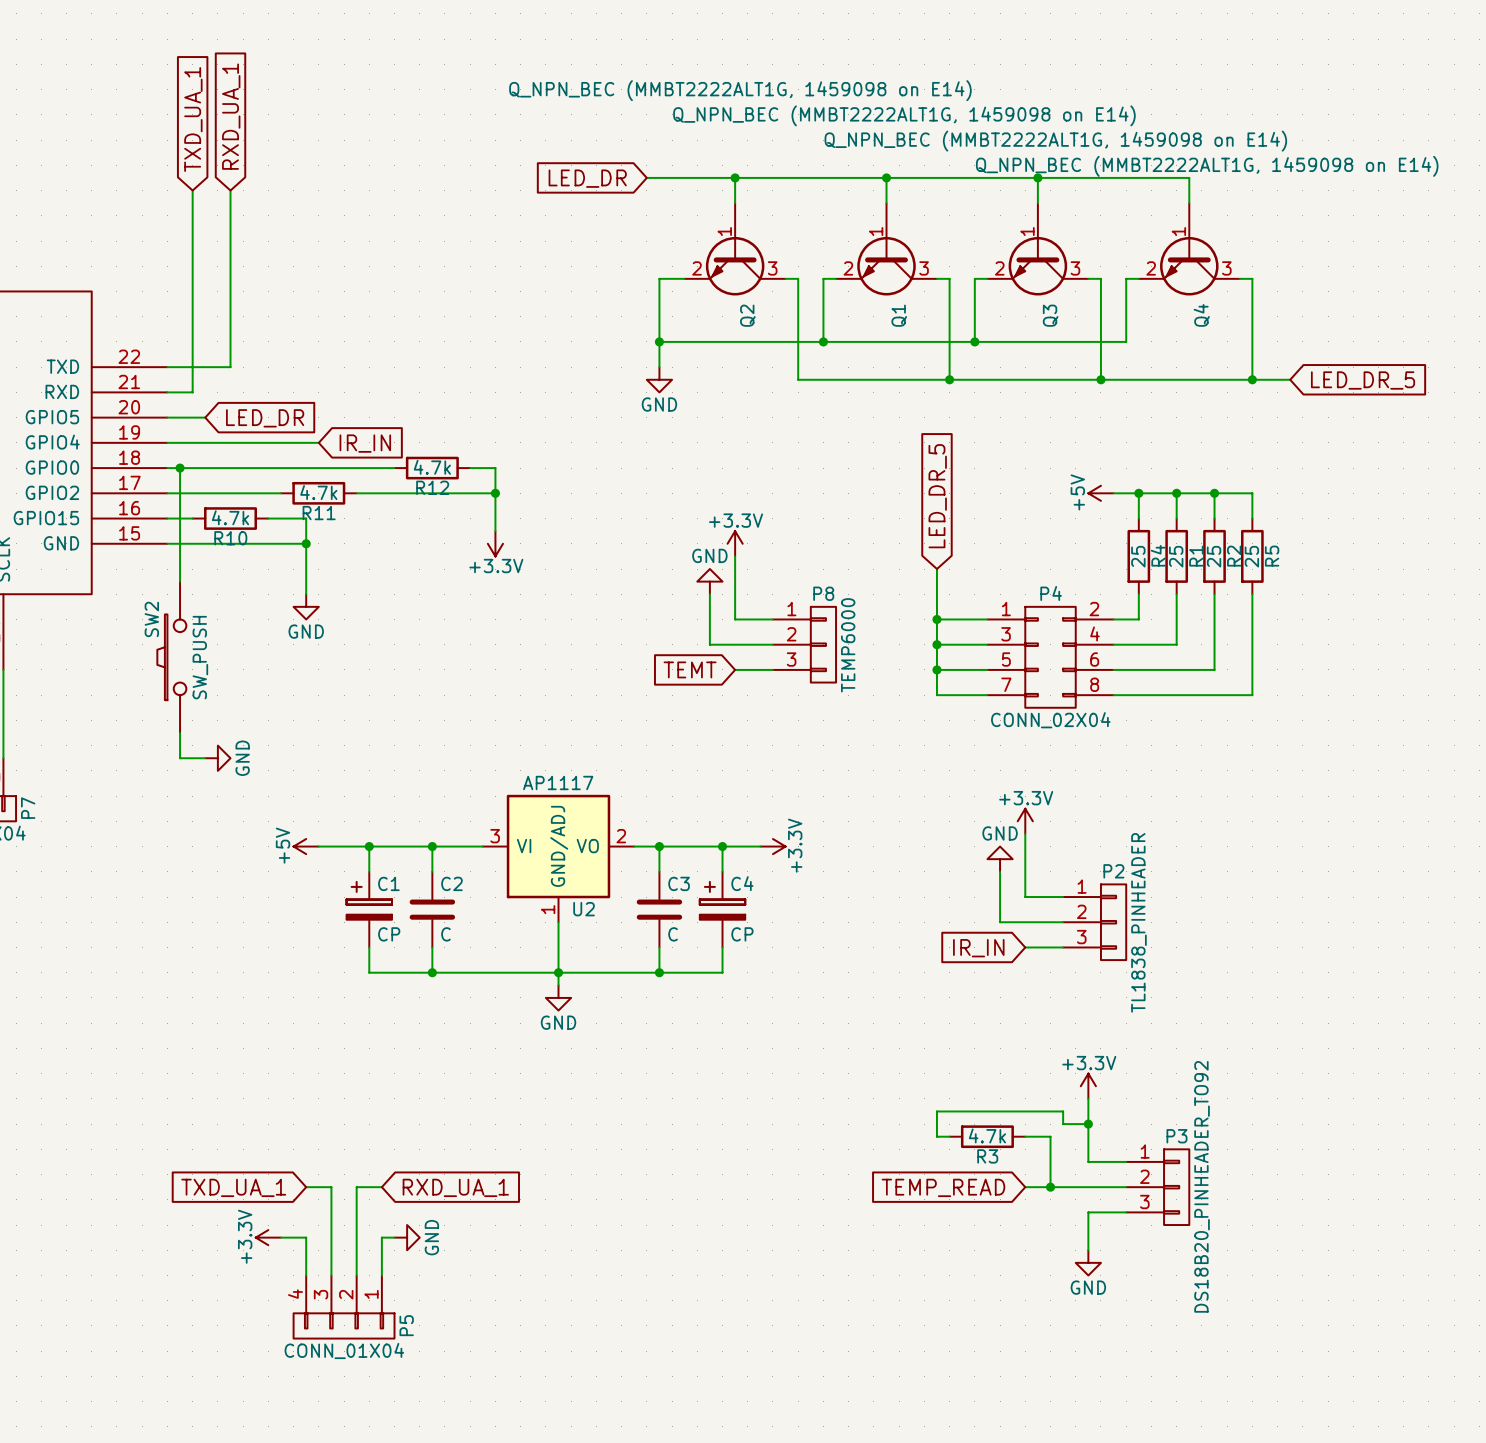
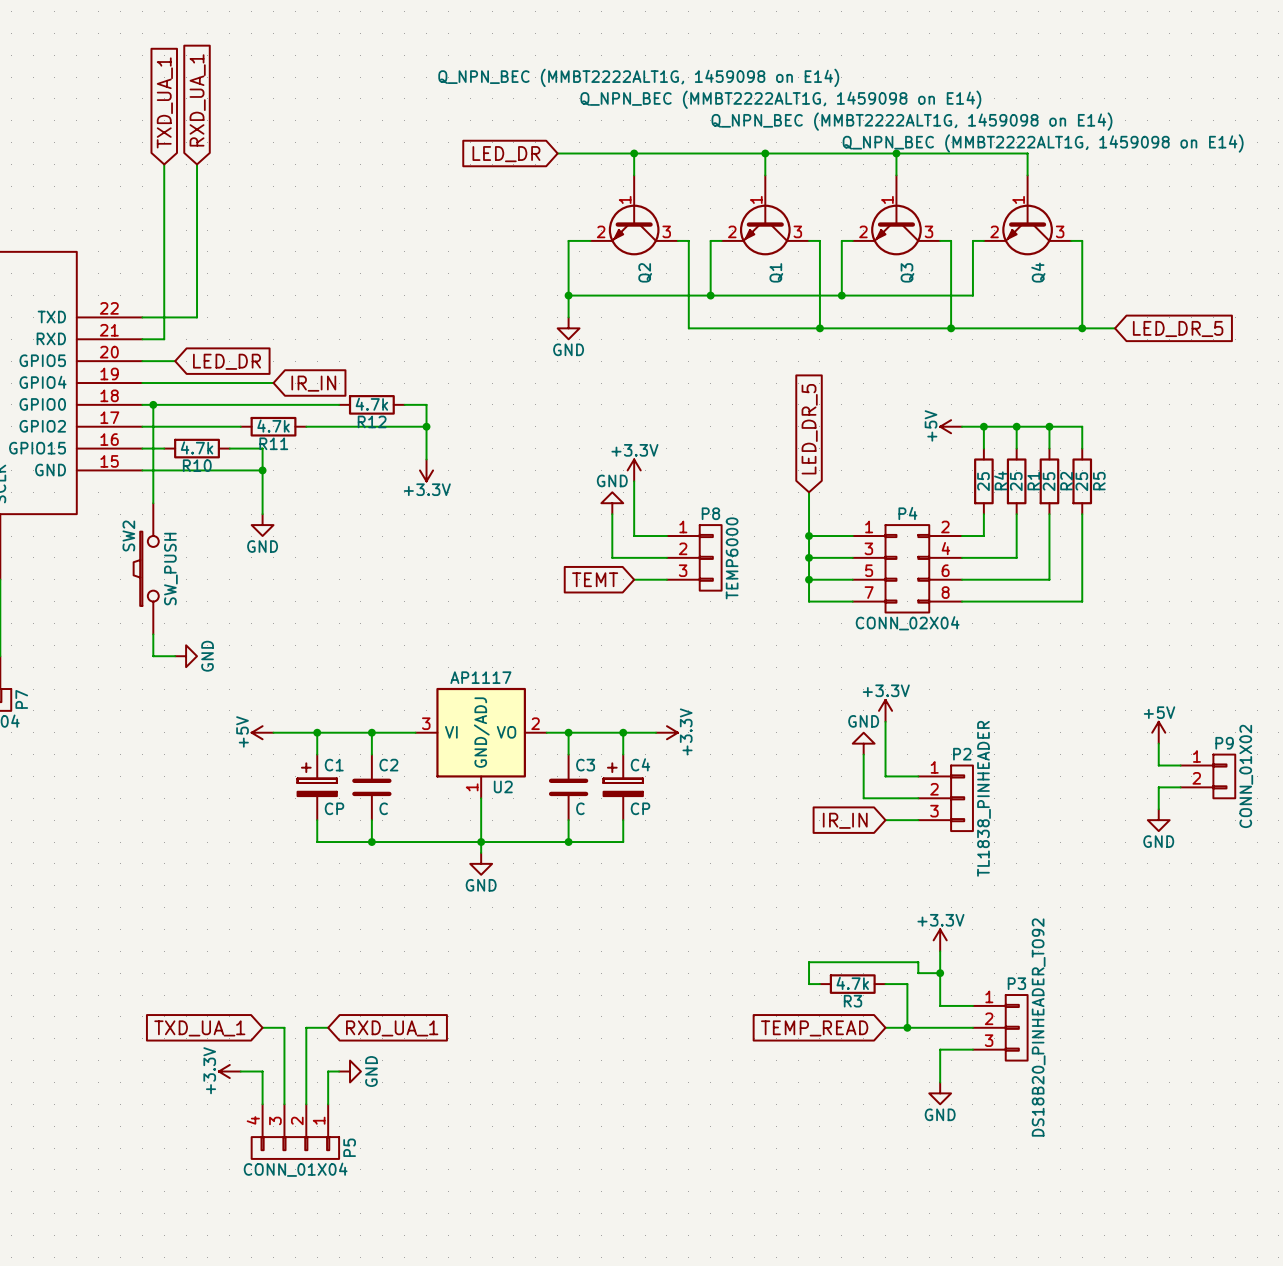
power symbol: none -> +5V (1158, 732)
wire: none -> (1158, 743) (1158, 765) (1180, 765)
P9: none -> CONN_01X02 (1207, 776)
wire: none -> (1180, 787) (1158, 787) (1158, 809)
power symbol: none -> GND (1158, 820)

